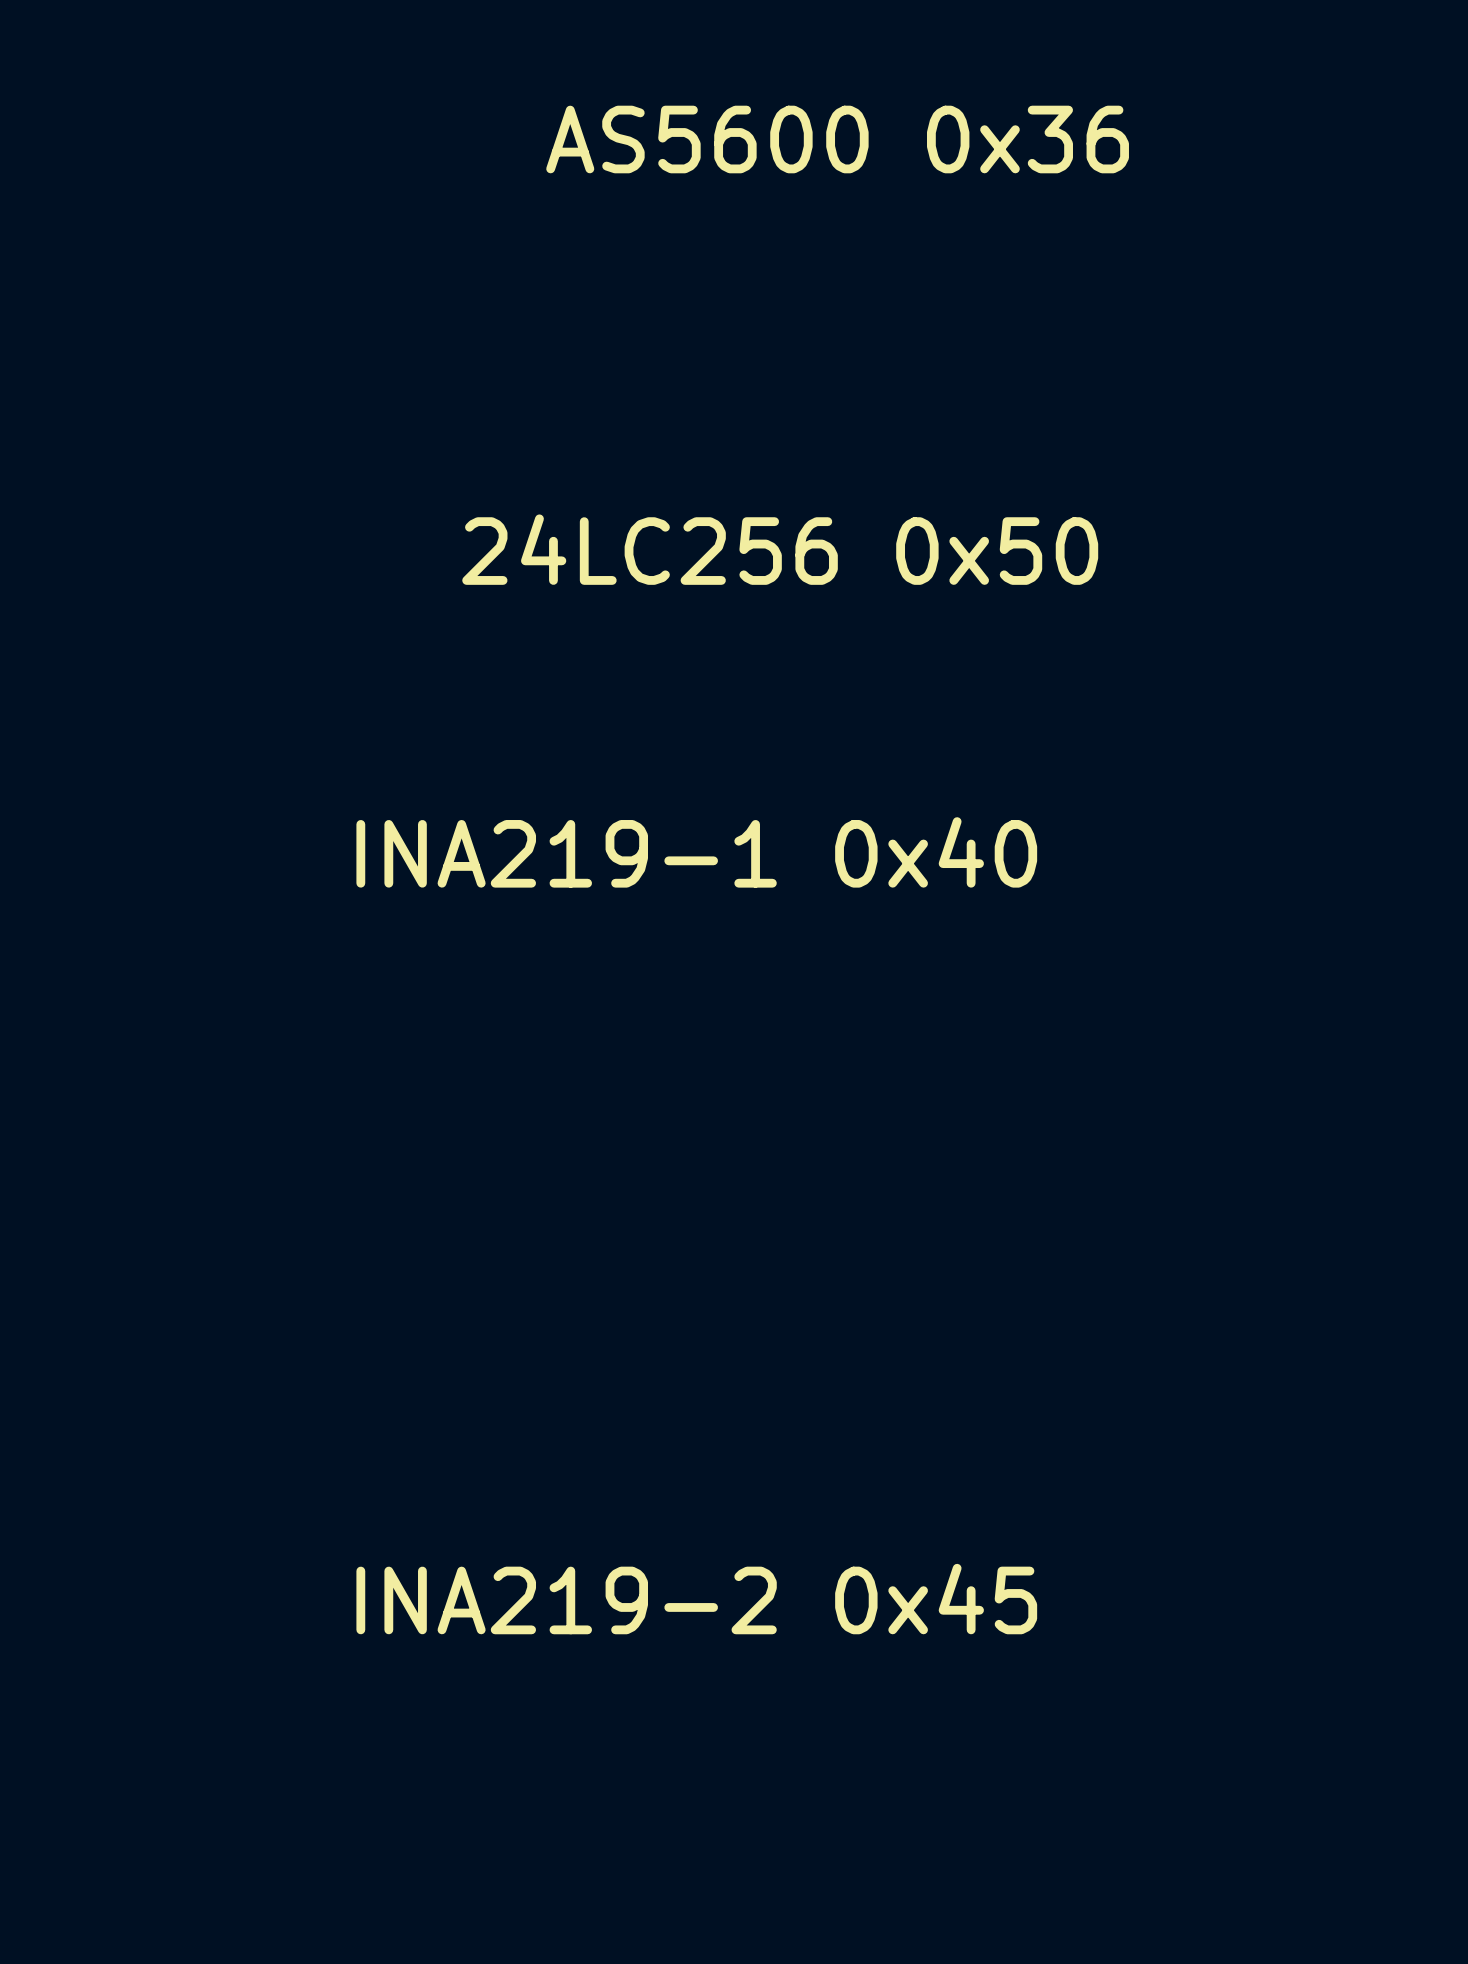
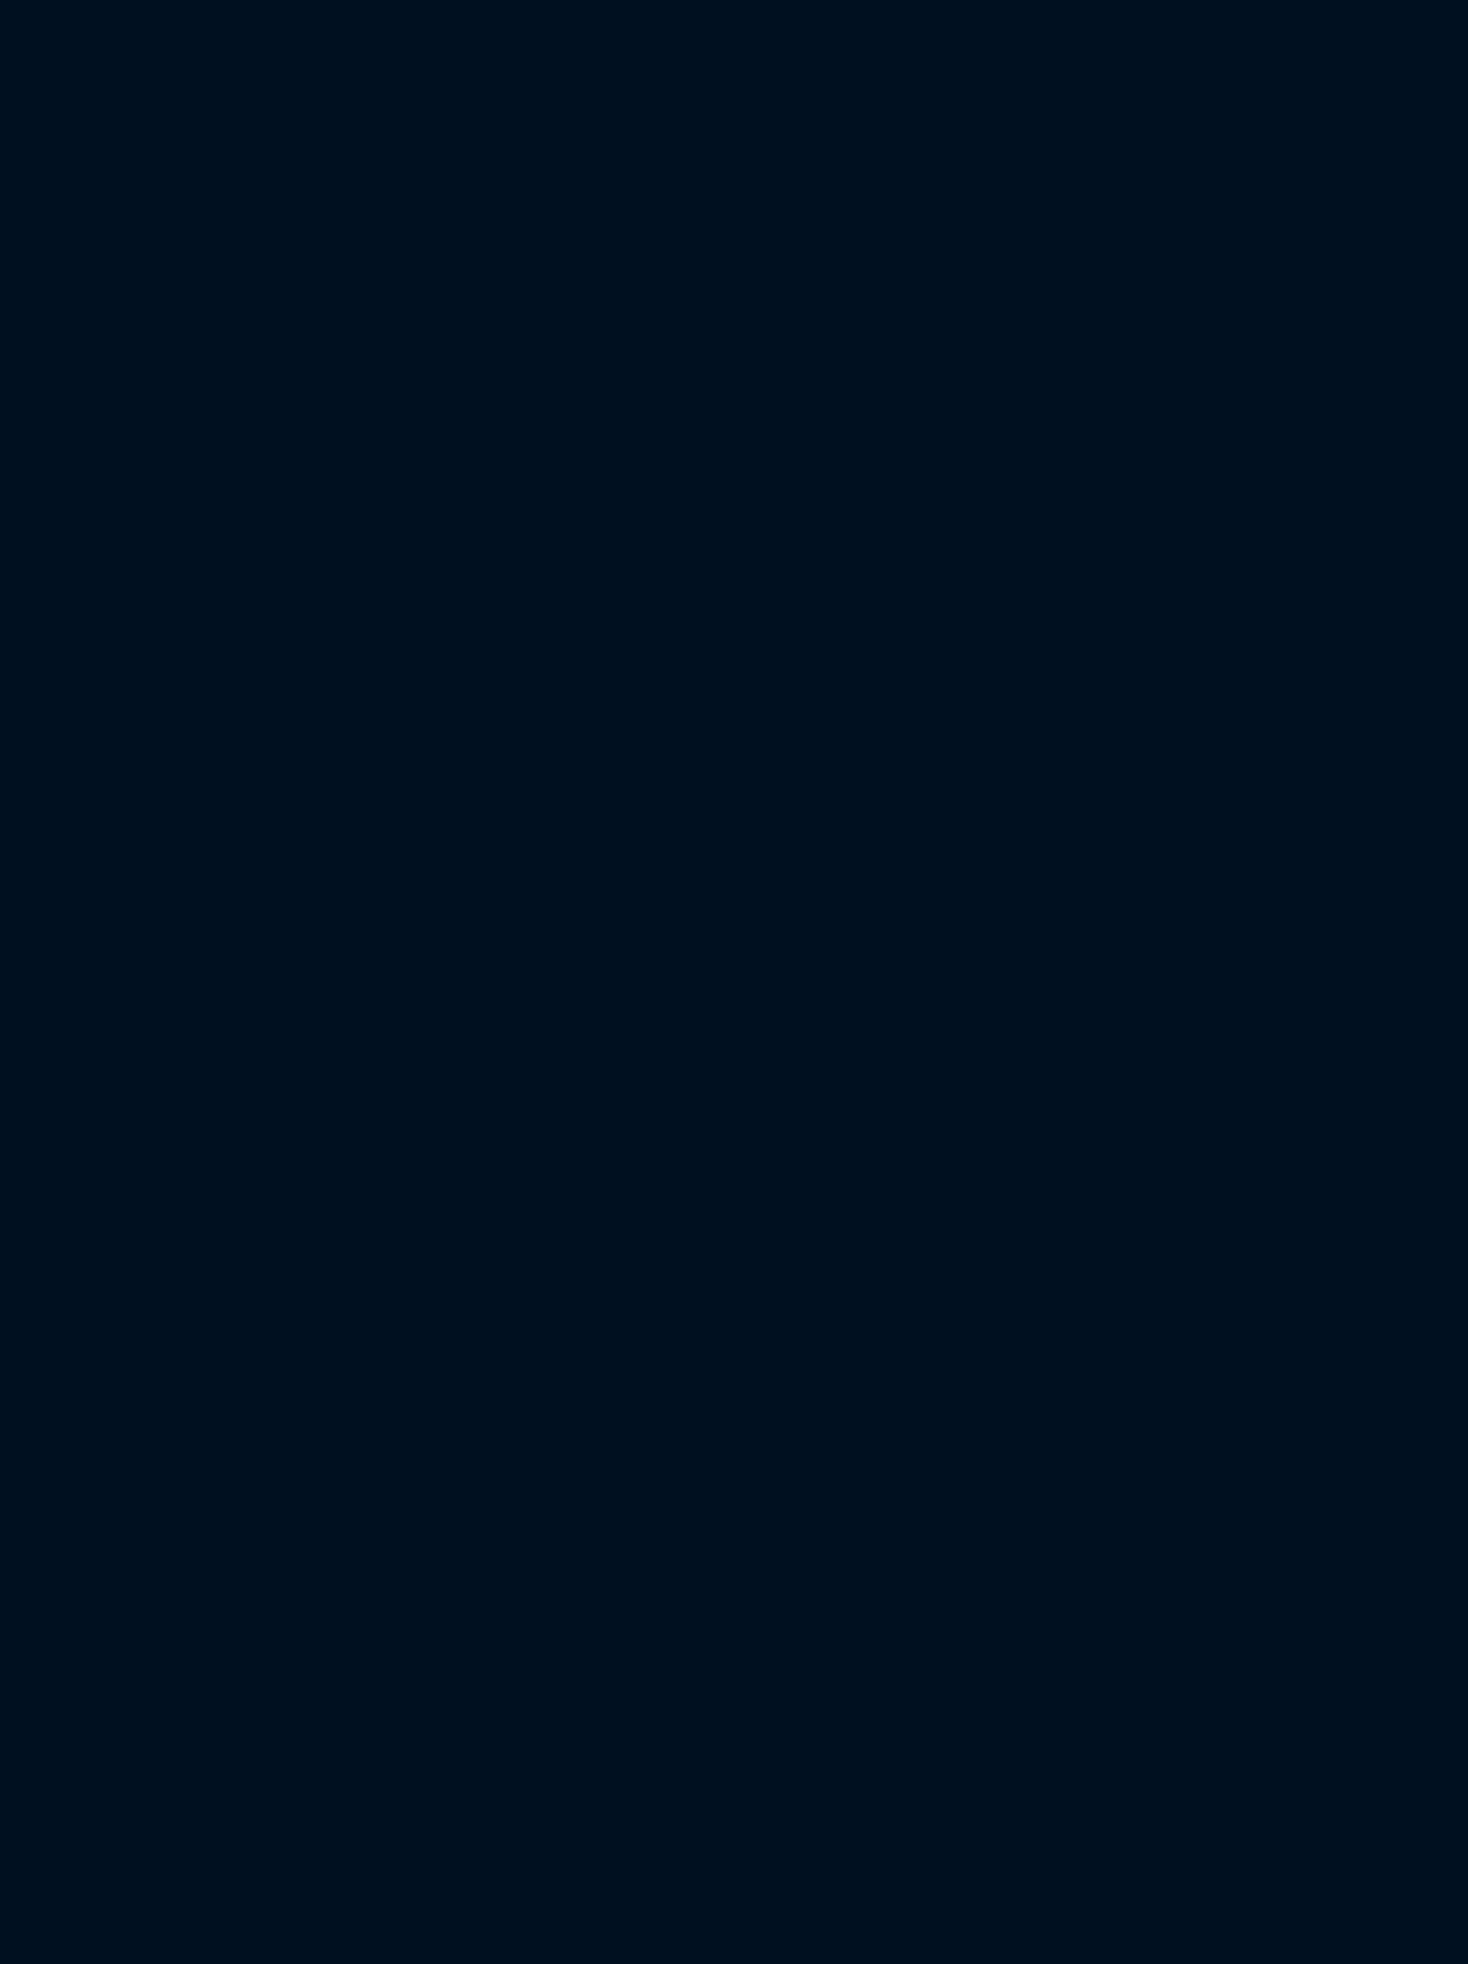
text: AS5600 0x36 (837, 139) -> none
text: 24LC256 0x50 (780, 549) -> none
text: INA219-1 0x40 (696, 852) -> none
text: INA219-2 0x45 (696, 1599) -> none

